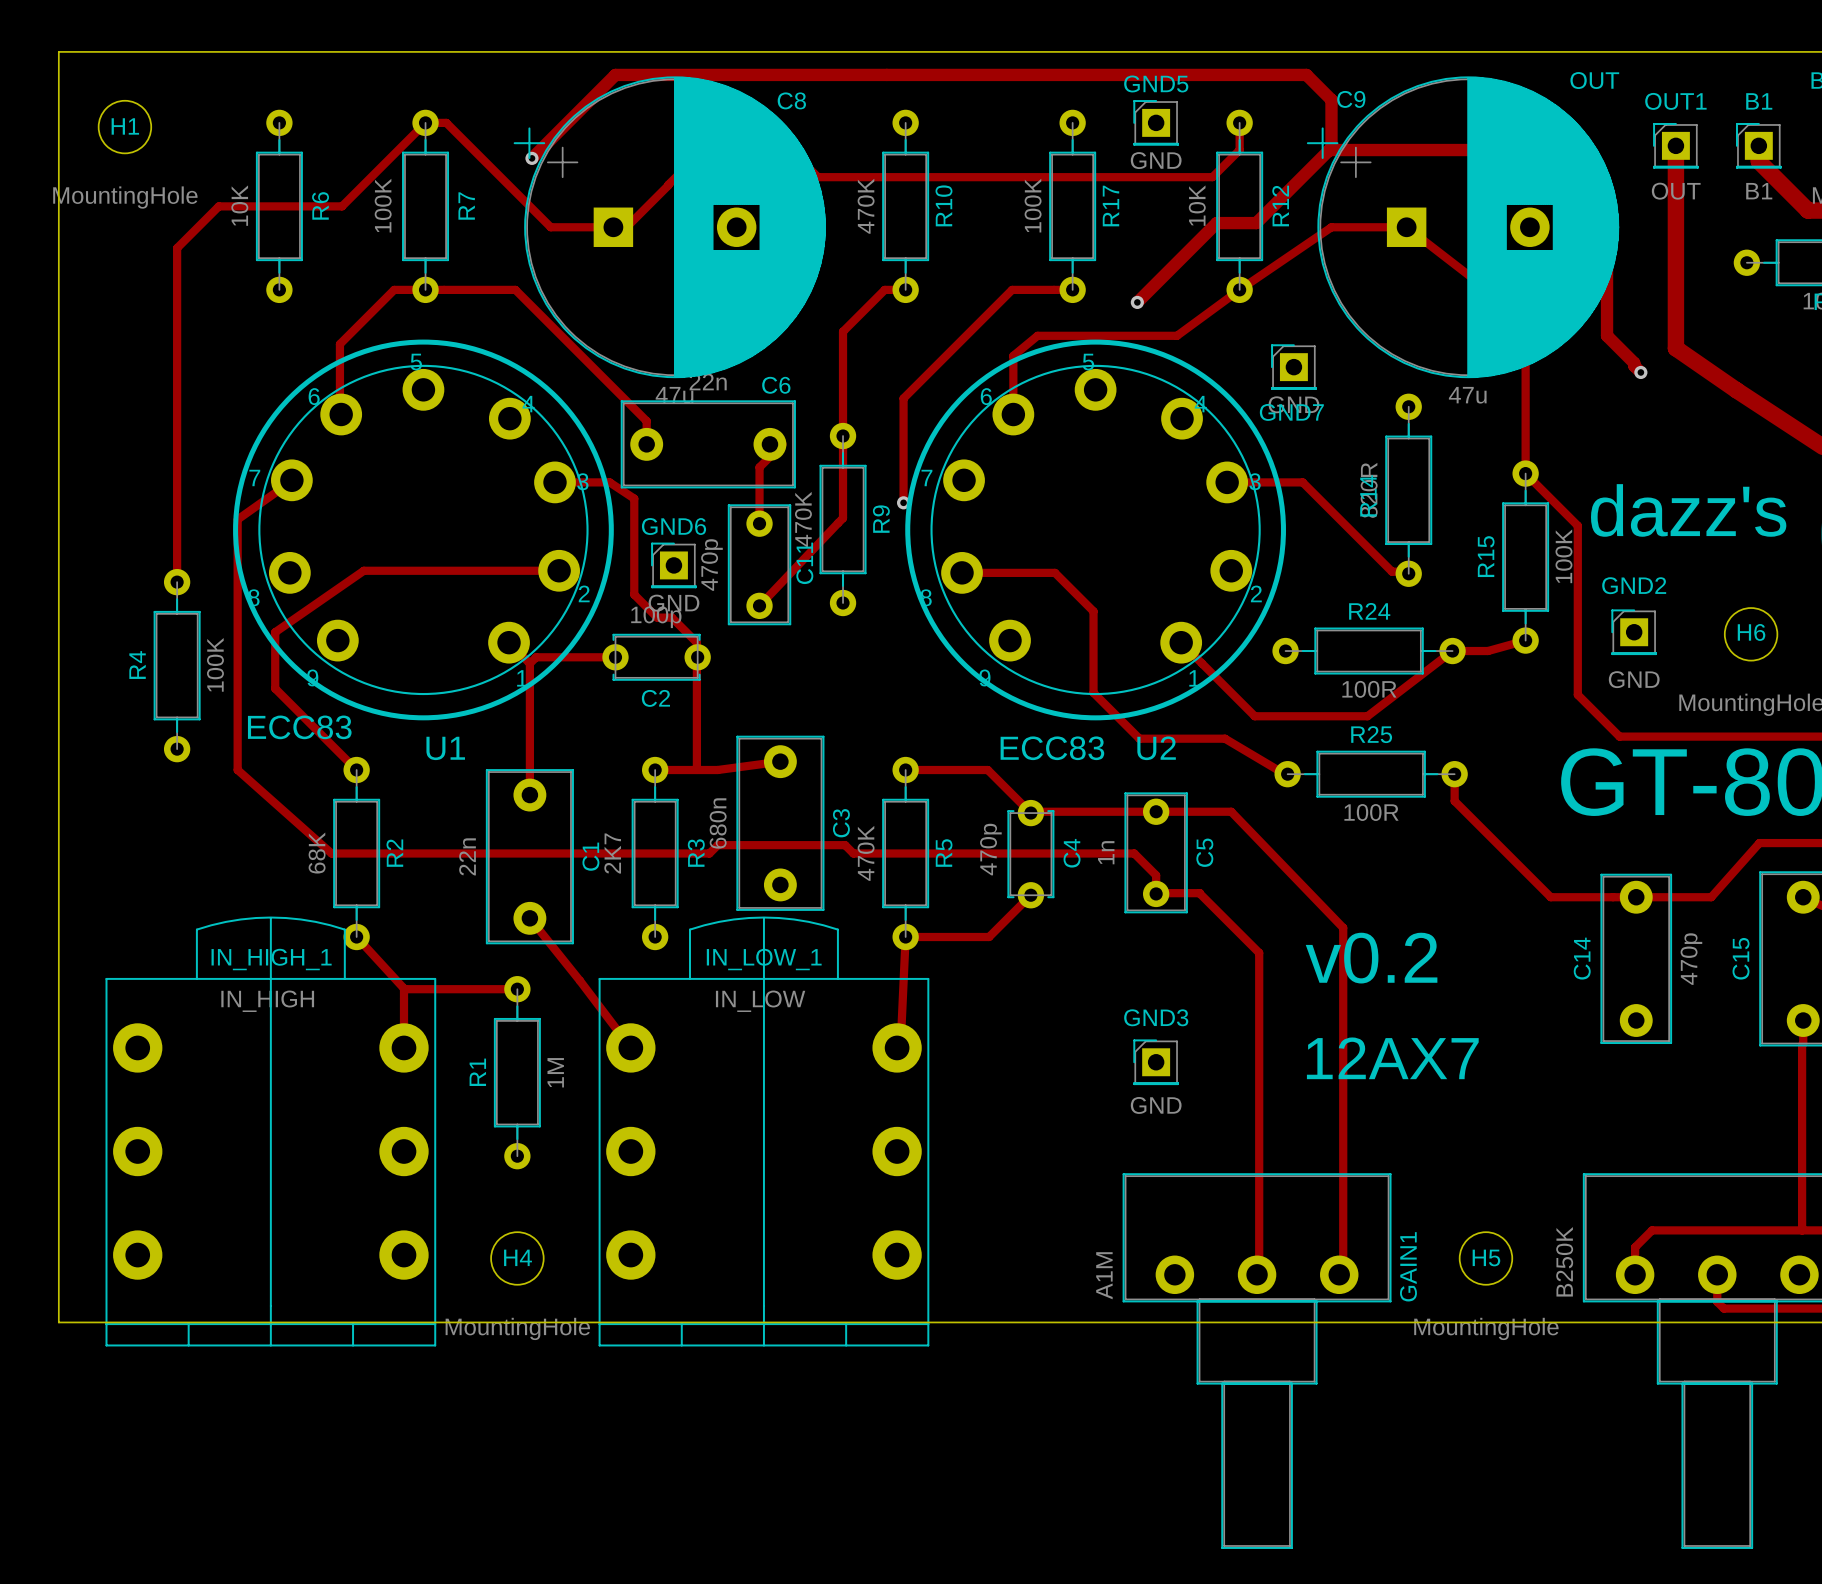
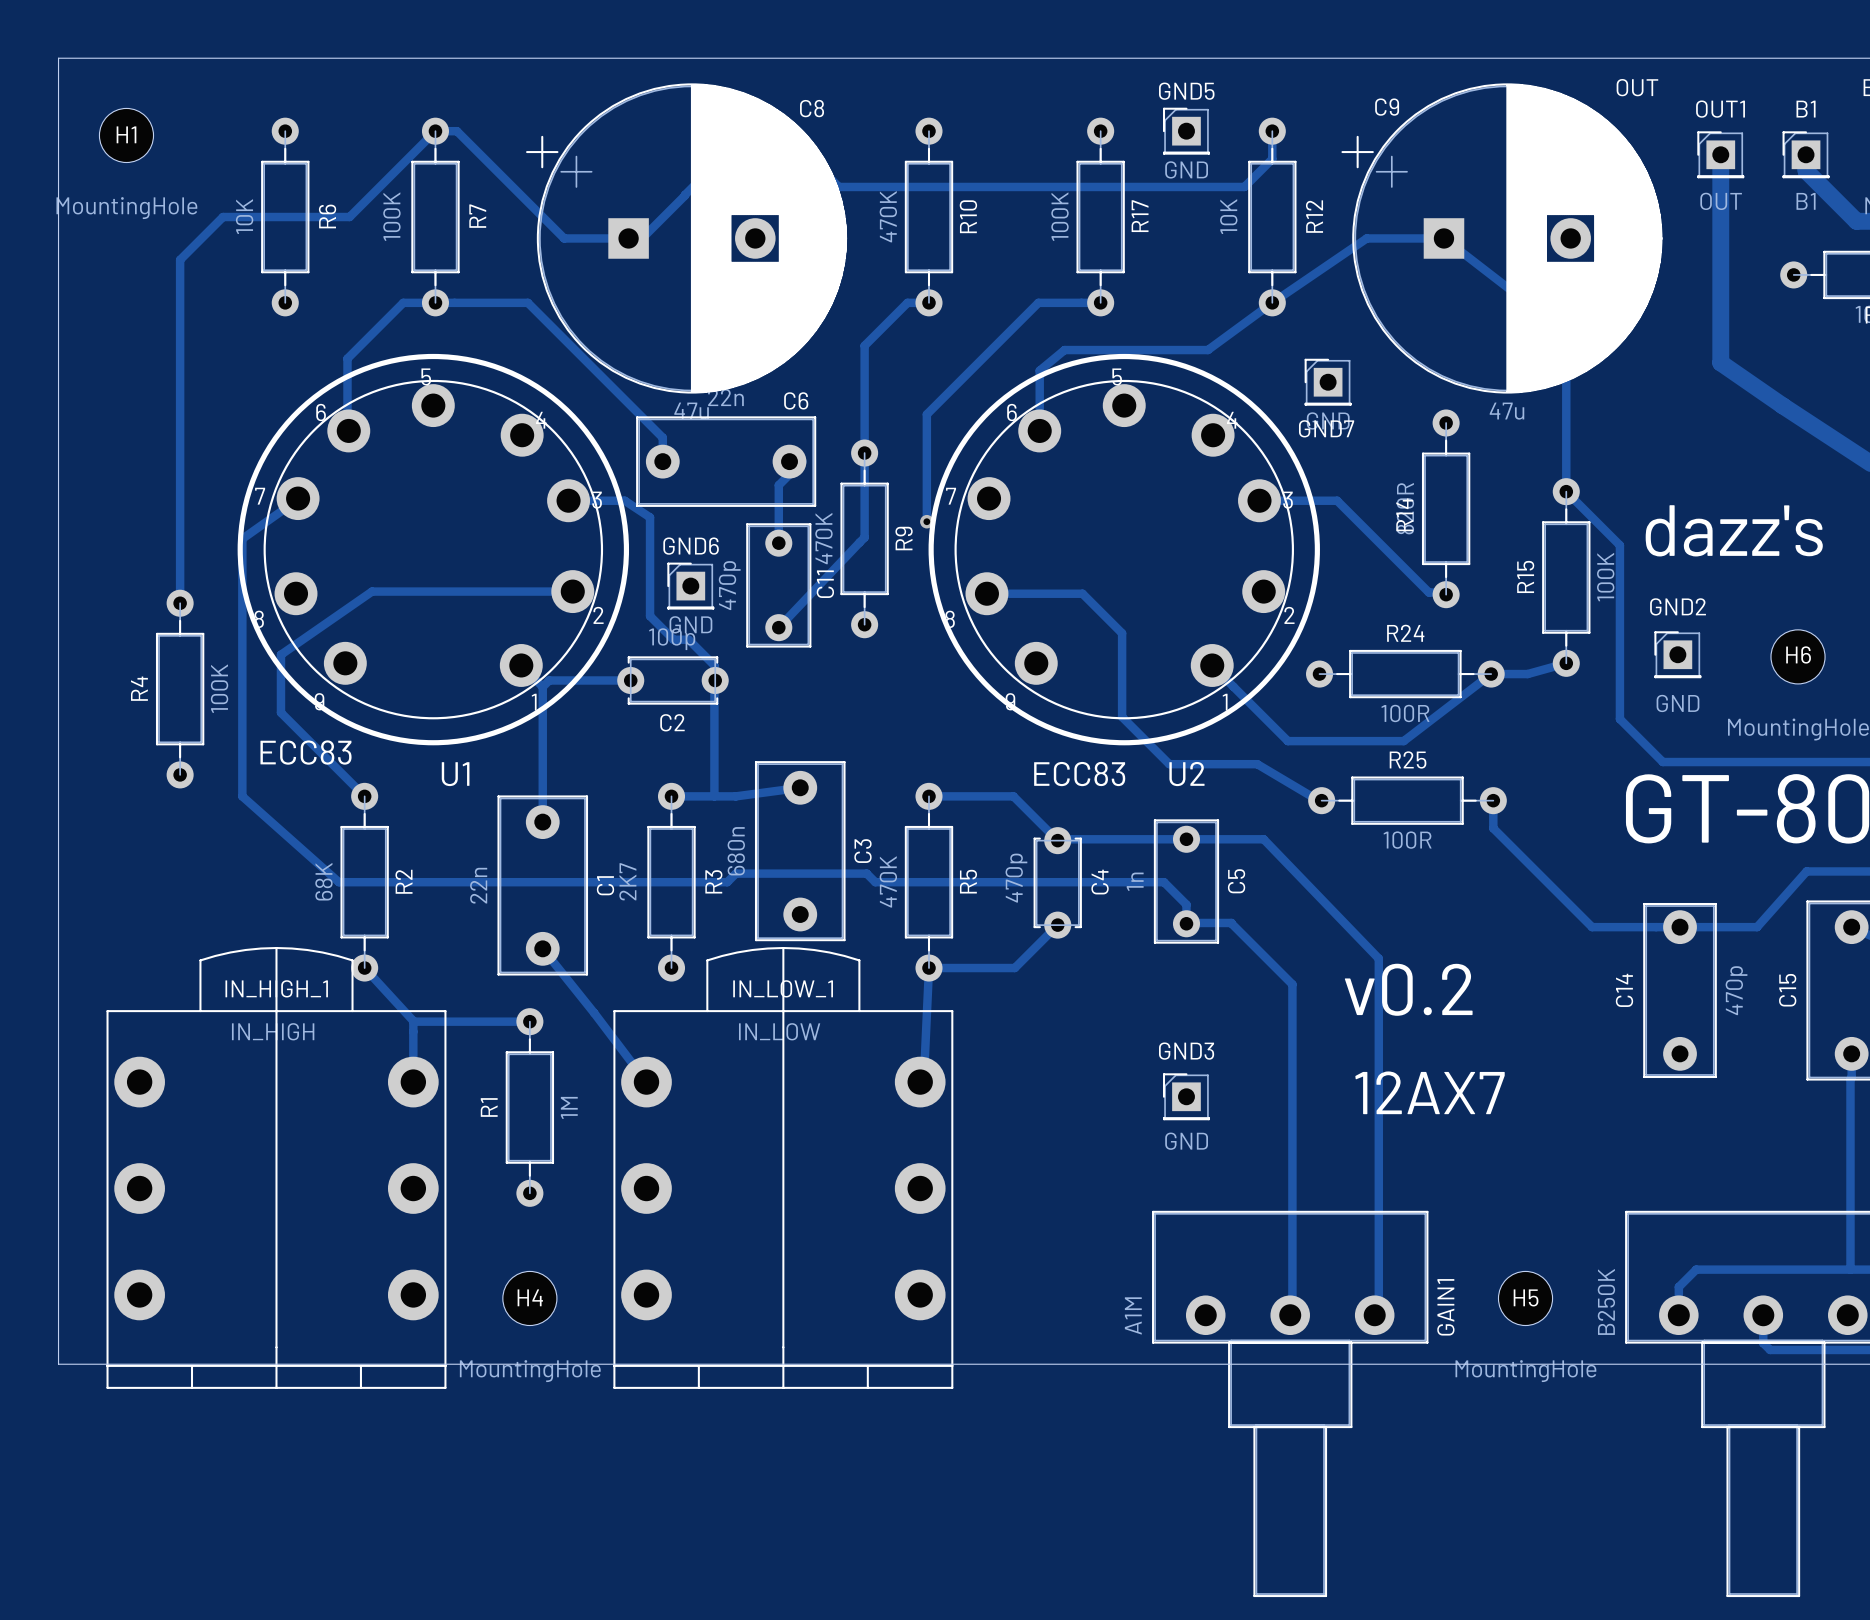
track: (1331, 150) (1331, 99) (1306, 74) (615, 74) (531, 158) -> none
via: (531, 158) -> none
track: (1137, 302) (1216, 223) (1256, 223) (1329, 150) (1540, 150) (1607, 216) (1607, 335) (1634, 363) (1634, 365) (1640, 372) -> none
via: (1137, 302) -> none
via: (1640, 372) -> none

